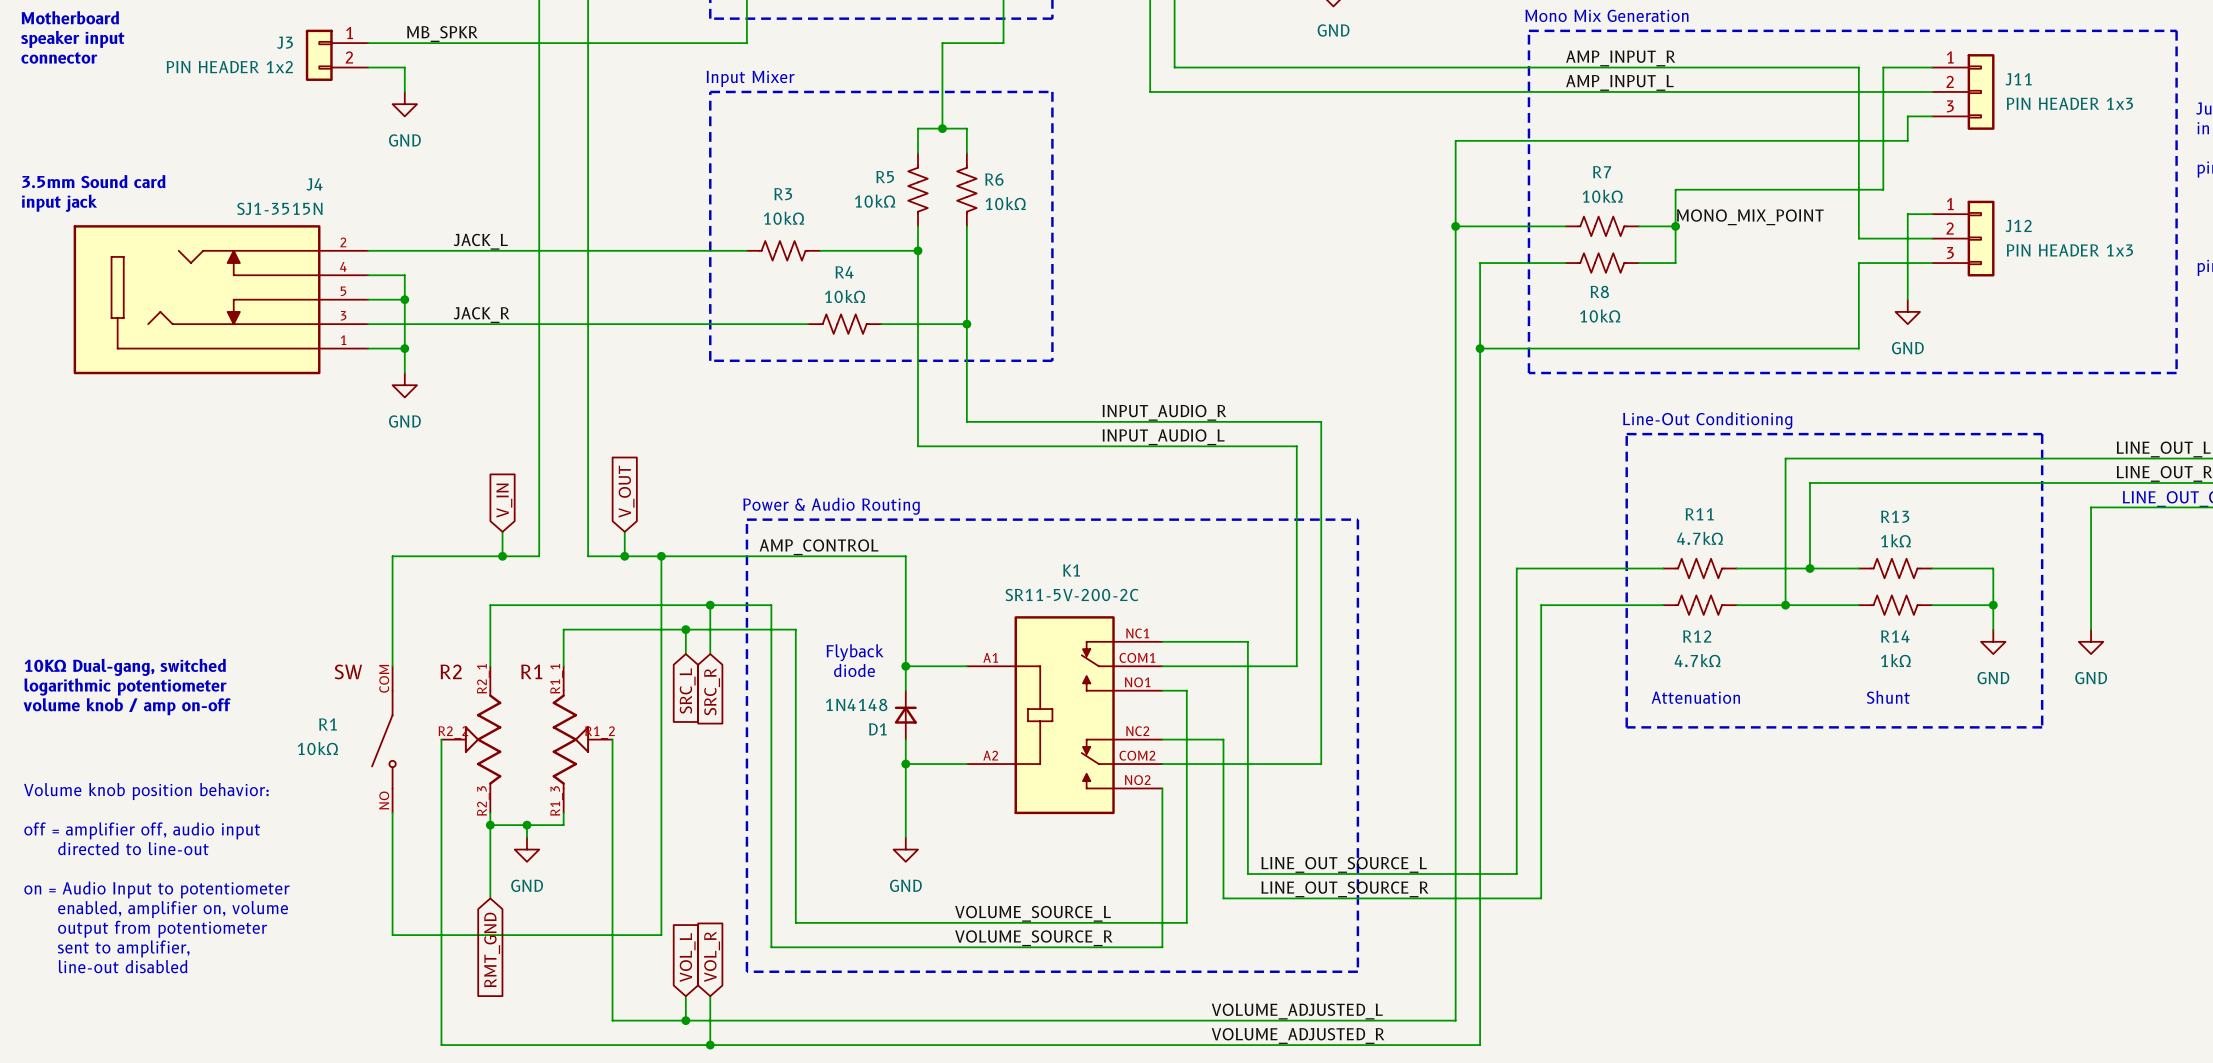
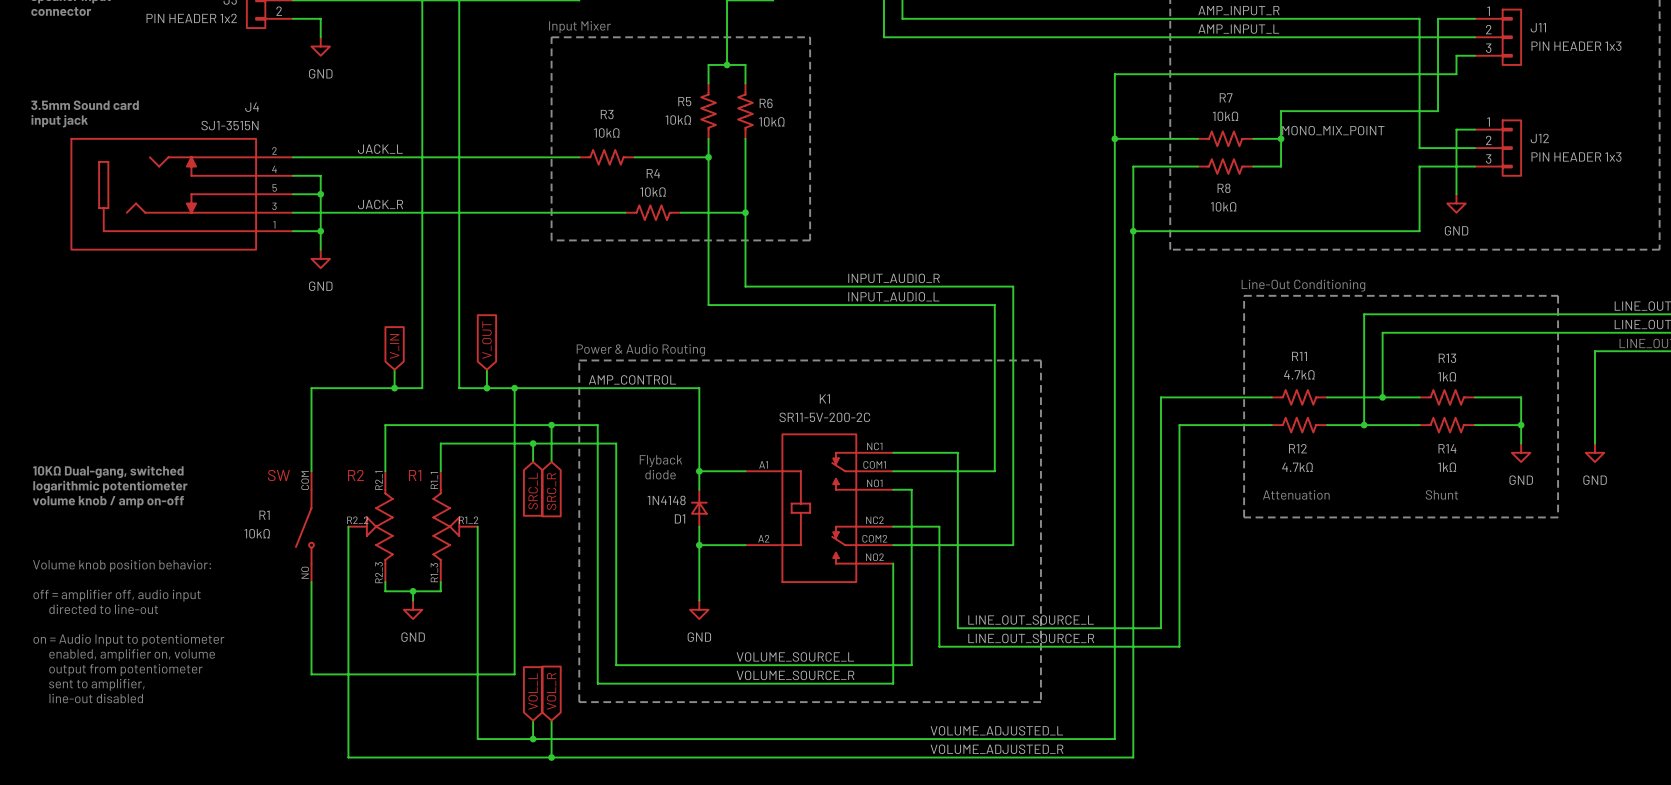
wire: (490, 825) (490, 898) -> none
junction: (490, 825) -> none
global label: RMT_GND (492, 949) -> none

